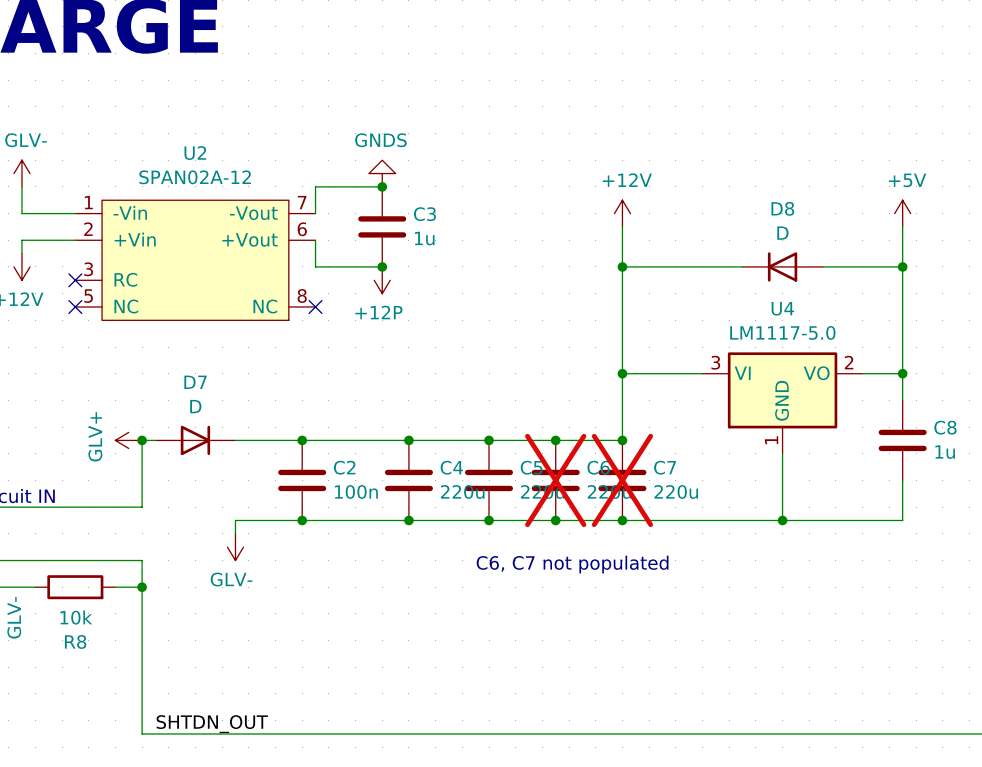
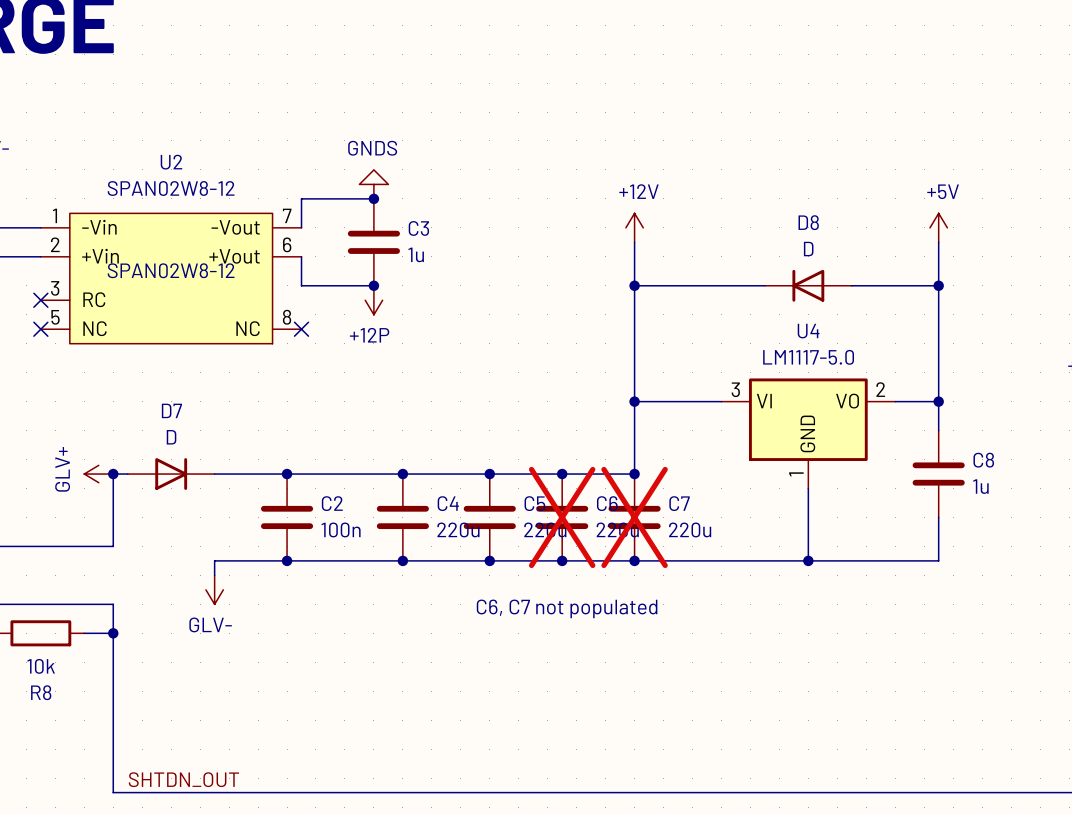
U2 value: SPAN02A-12 (195, 177) -> SPAN02W8-12 (171, 188)
U2 text: none -> SPAN02W8-12 (171, 270)

